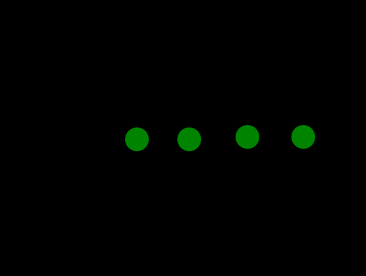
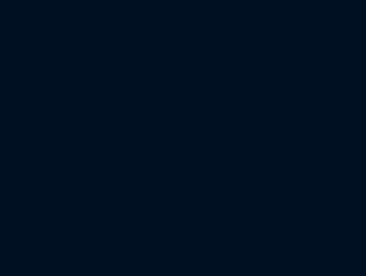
part: (247, 136) -> none
part: (303, 136) -> none
part: (136, 139) -> none
part: (189, 139) -> none

